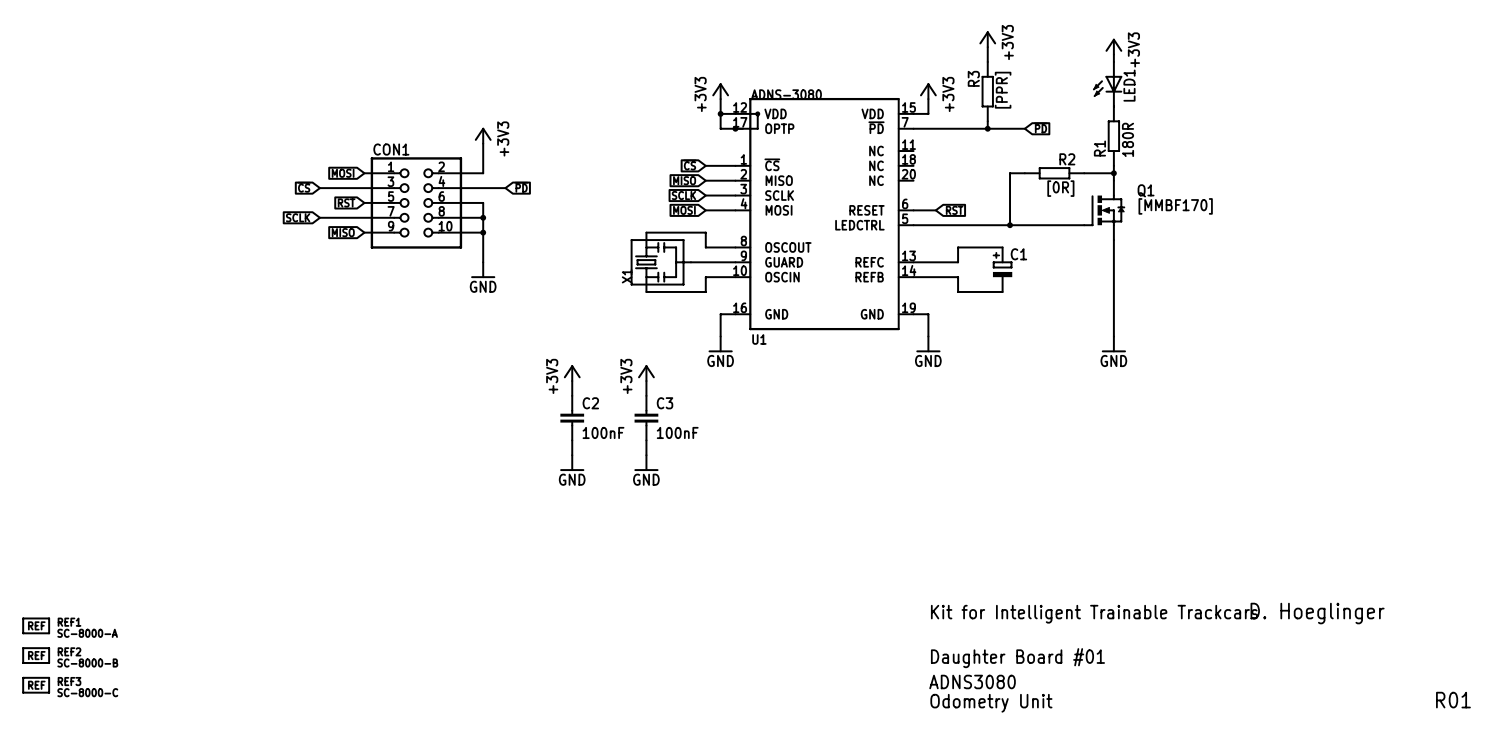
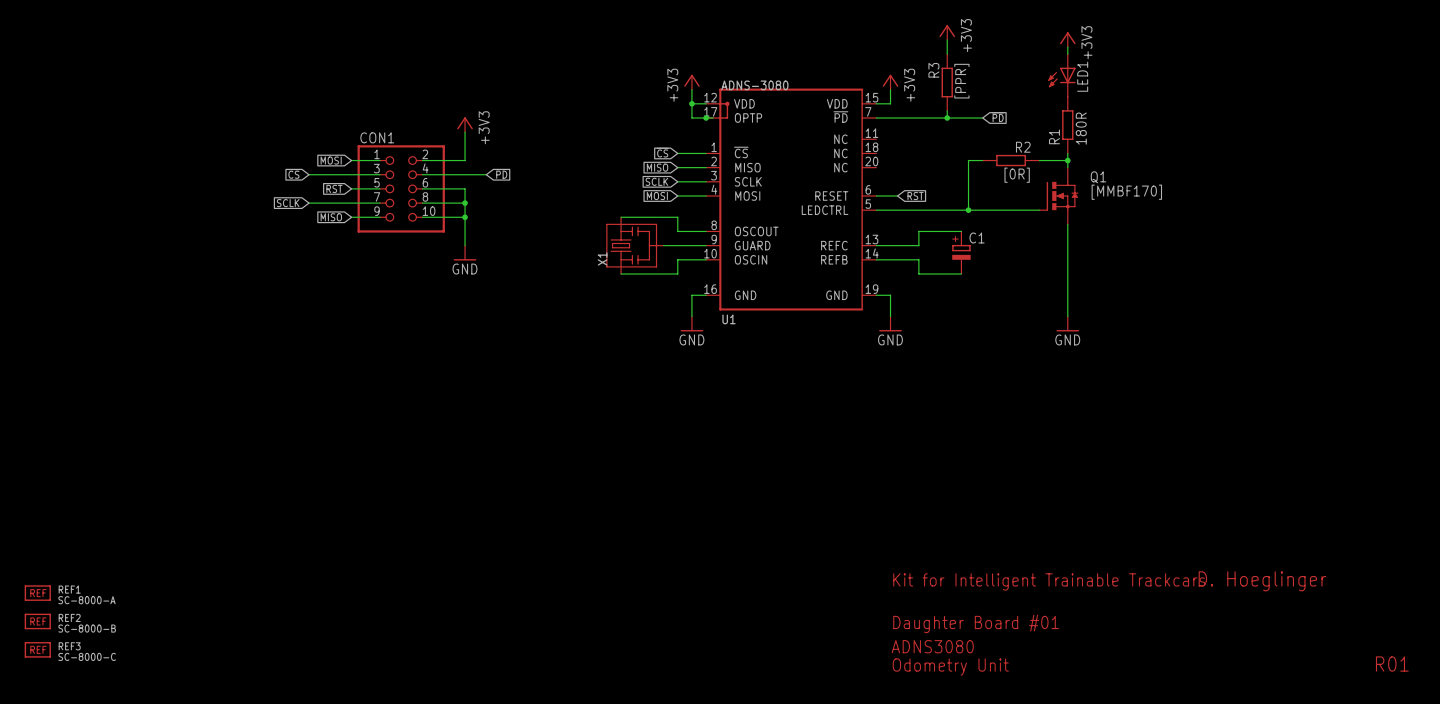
power symbol: +3V3 (572, 373) -> none
power symbol: +3V3 (646, 373) -> none
wire: (572, 381) (572, 395) -> none
wire: (646, 381) (646, 395) -> none
C2: 100nF (572, 418) -> none
C3: 100nF (646, 418) -> none
wire: (572, 440) (572, 455) -> none
wire: (646, 440) (646, 455) -> none
power symbol: GND (572, 463) -> none
power symbol: GND (646, 463) -> none

